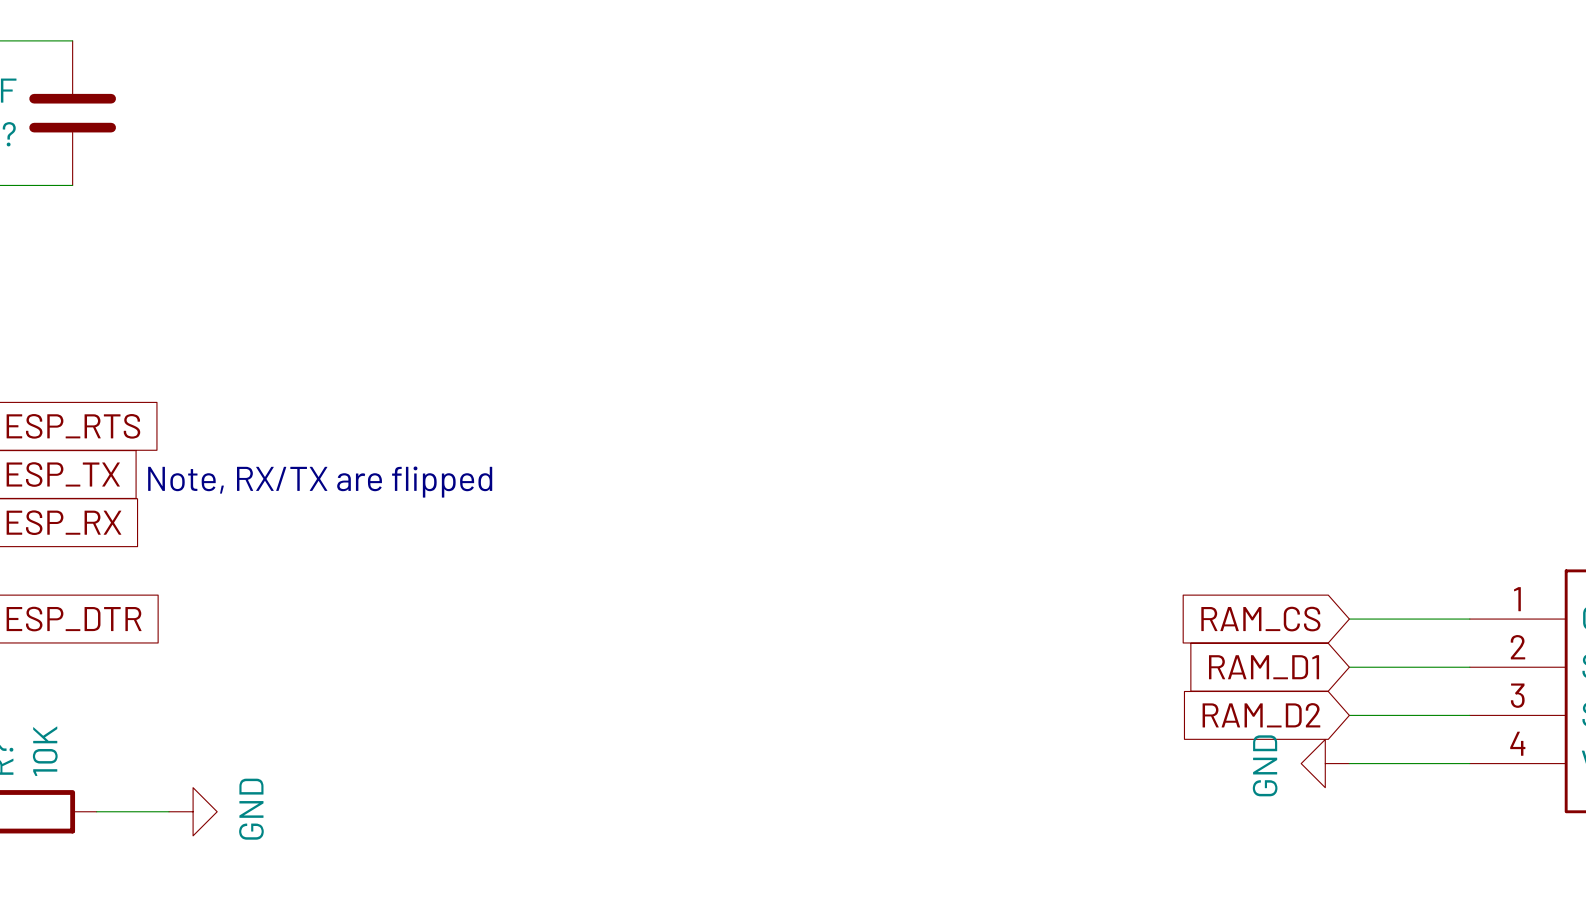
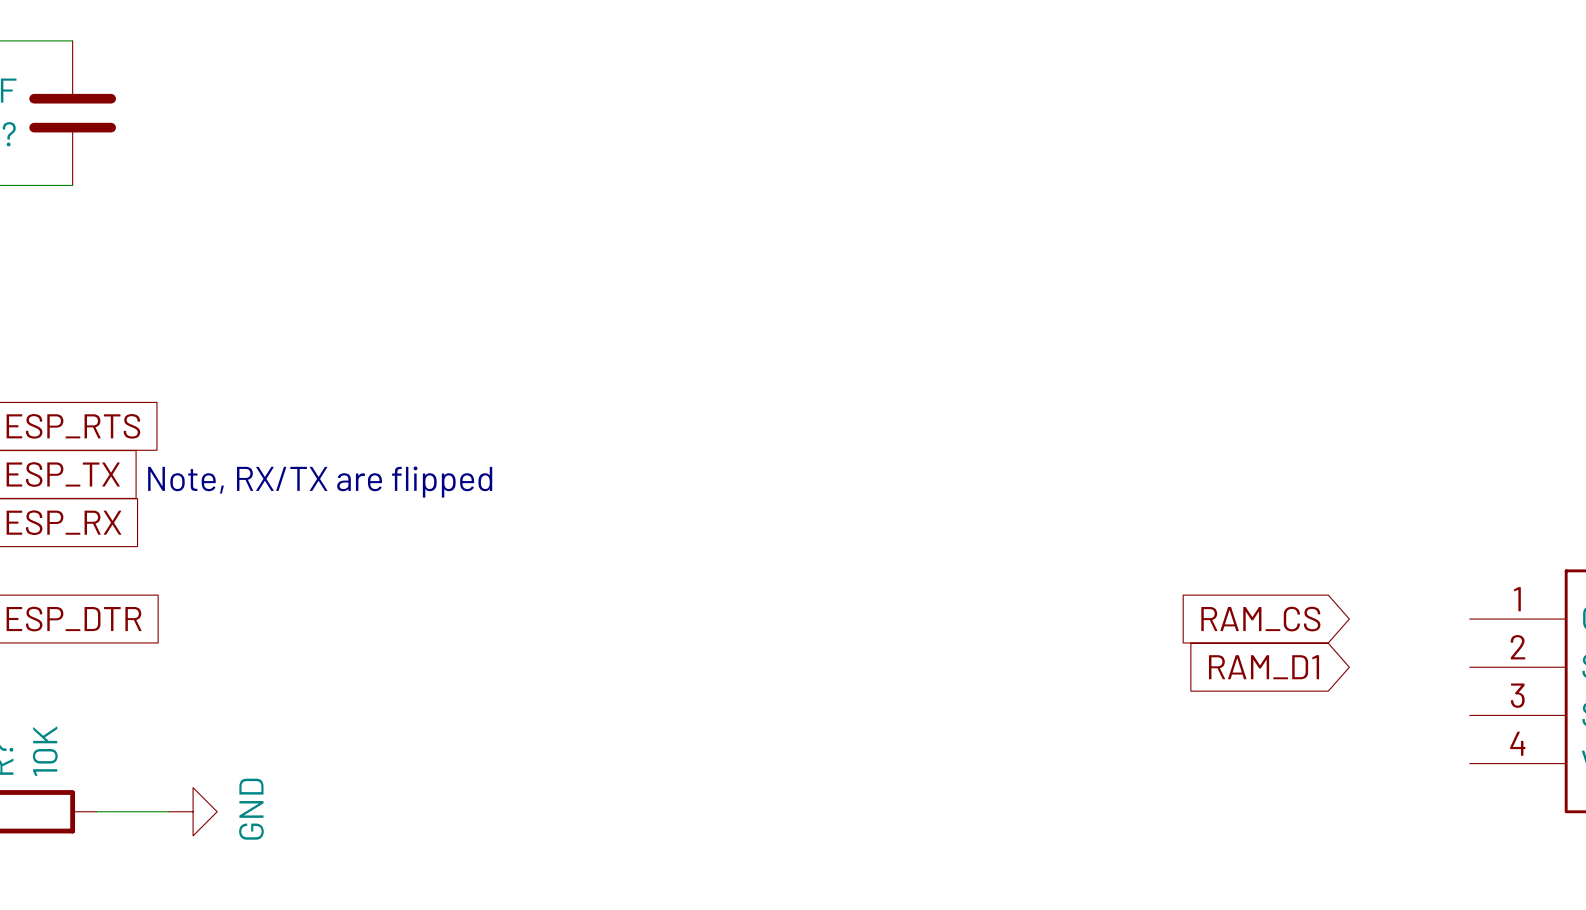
wire: (1349, 619) (1469, 619) -> none
wire: (1349, 667) (1469, 667) -> none
global label: RAM_D2 (1261, 715) -> none
wire: (1349, 715) (1469, 715) -> none
power symbol: GND (1325, 763) -> none
wire: (1349, 763) (1469, 763) -> none

